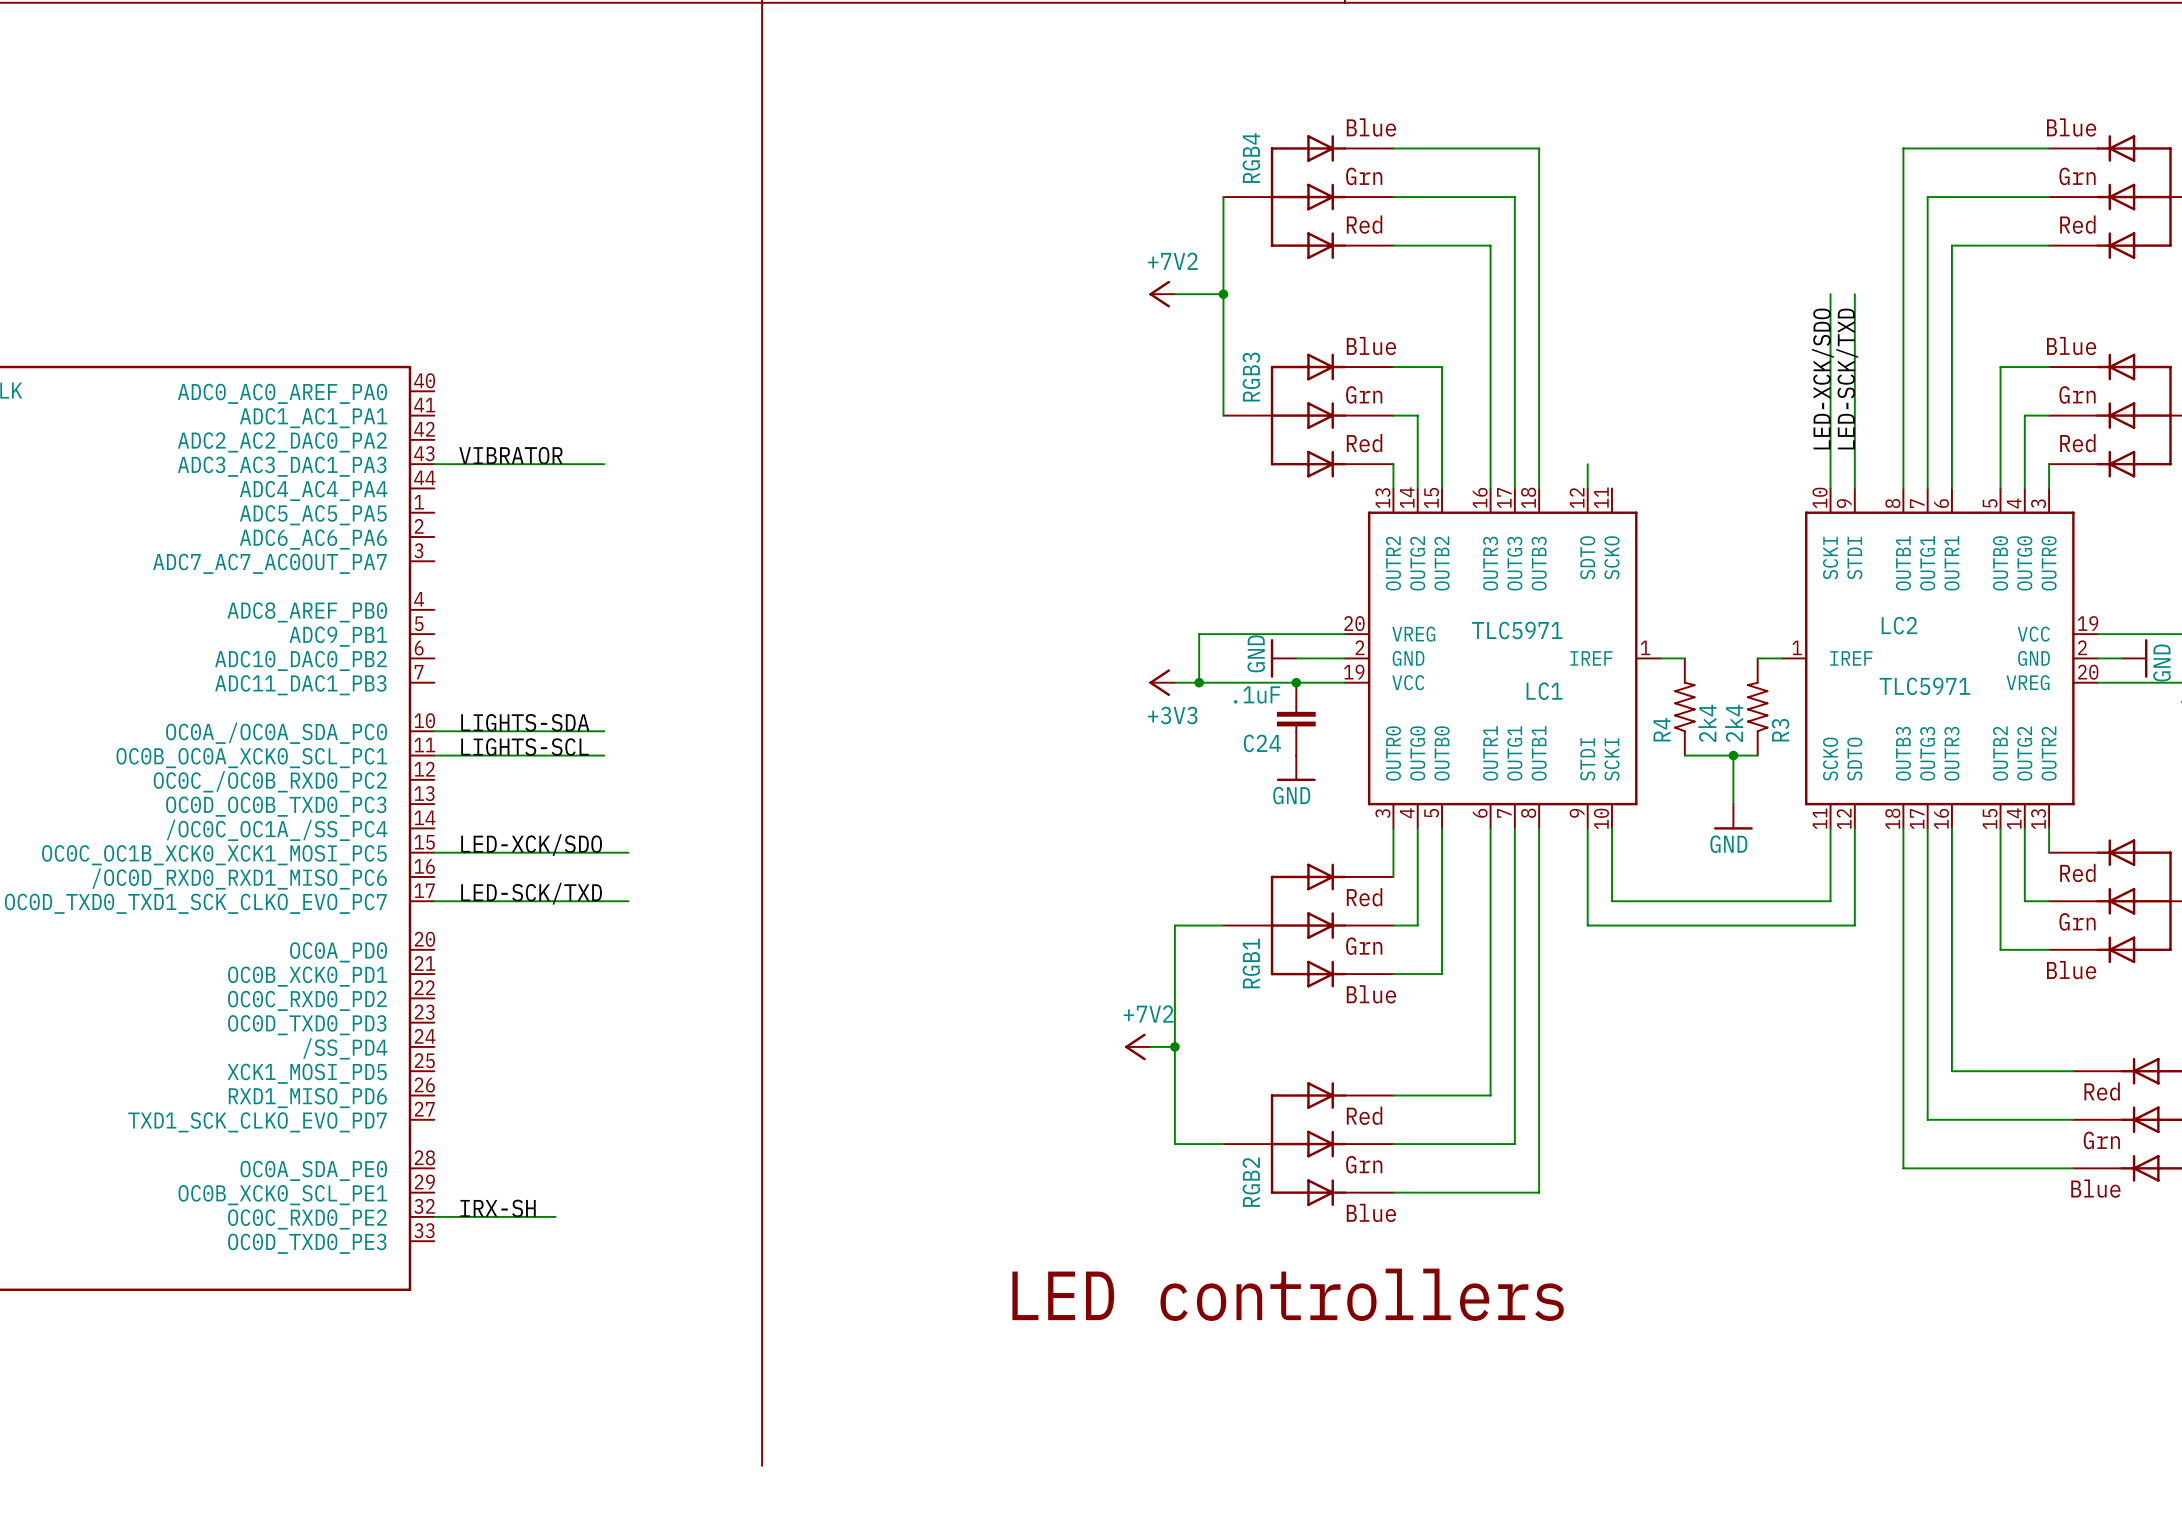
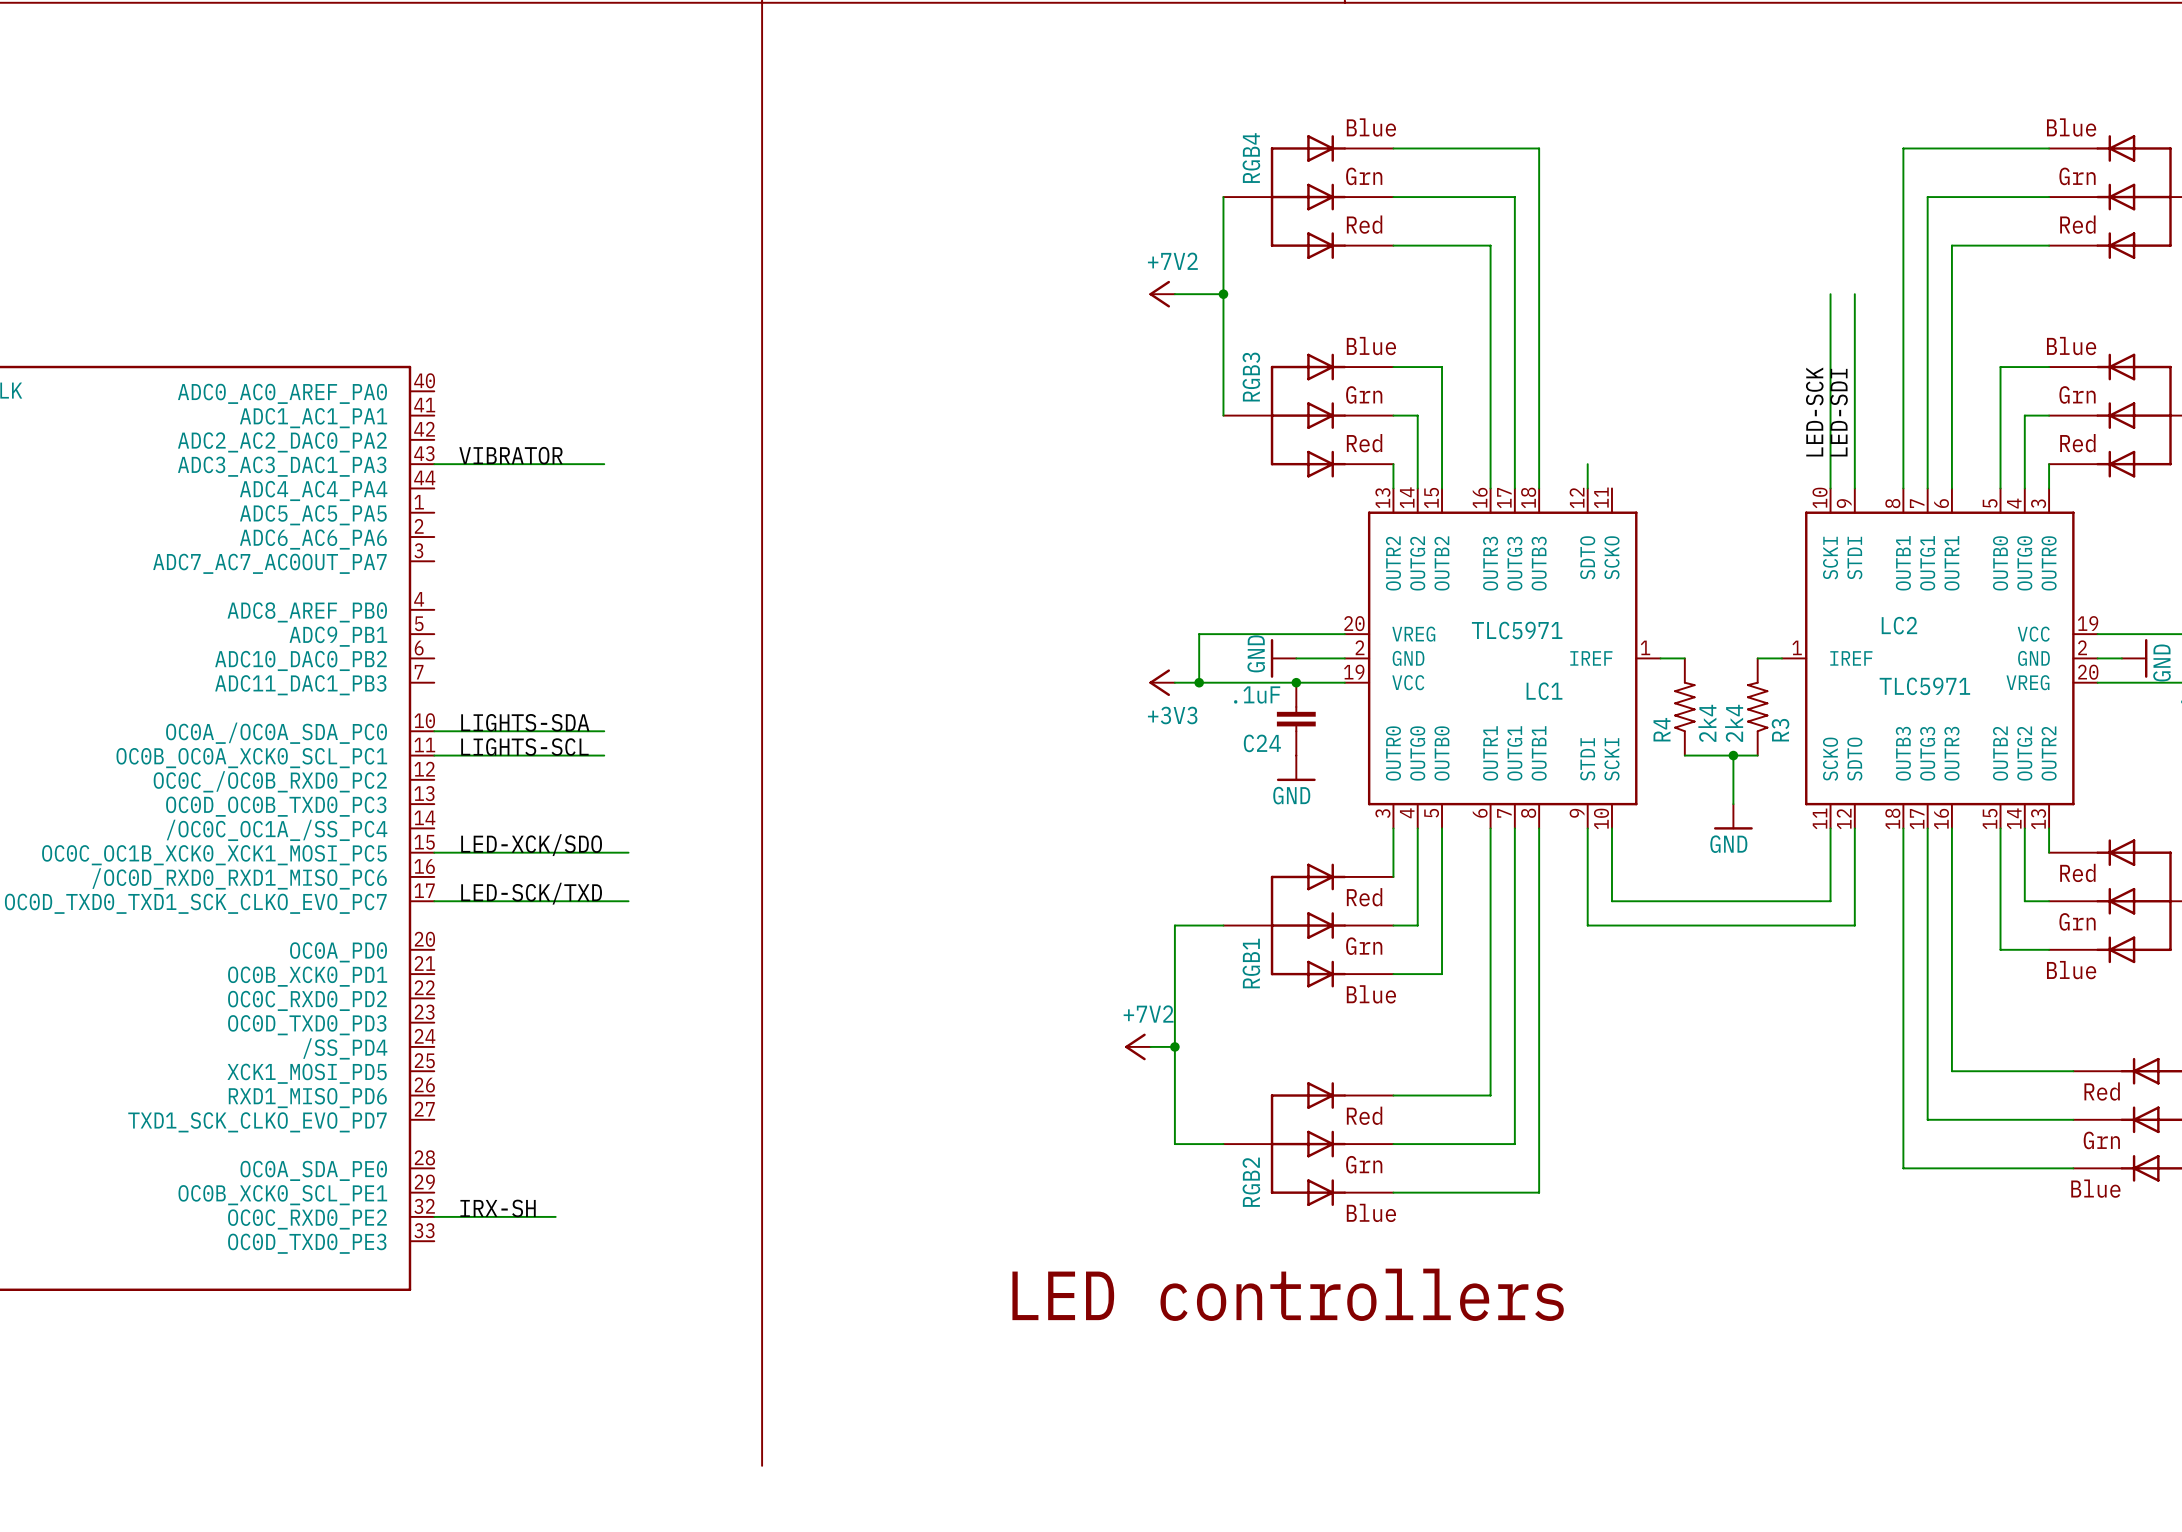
label: LED-XCK/SDO (1822, 378) -> none
label: LED-SCK/TXD (1847, 378) -> none
label: none -> LED-SCK (1814, 411)
label: none -> LED-SDI (1839, 412)

